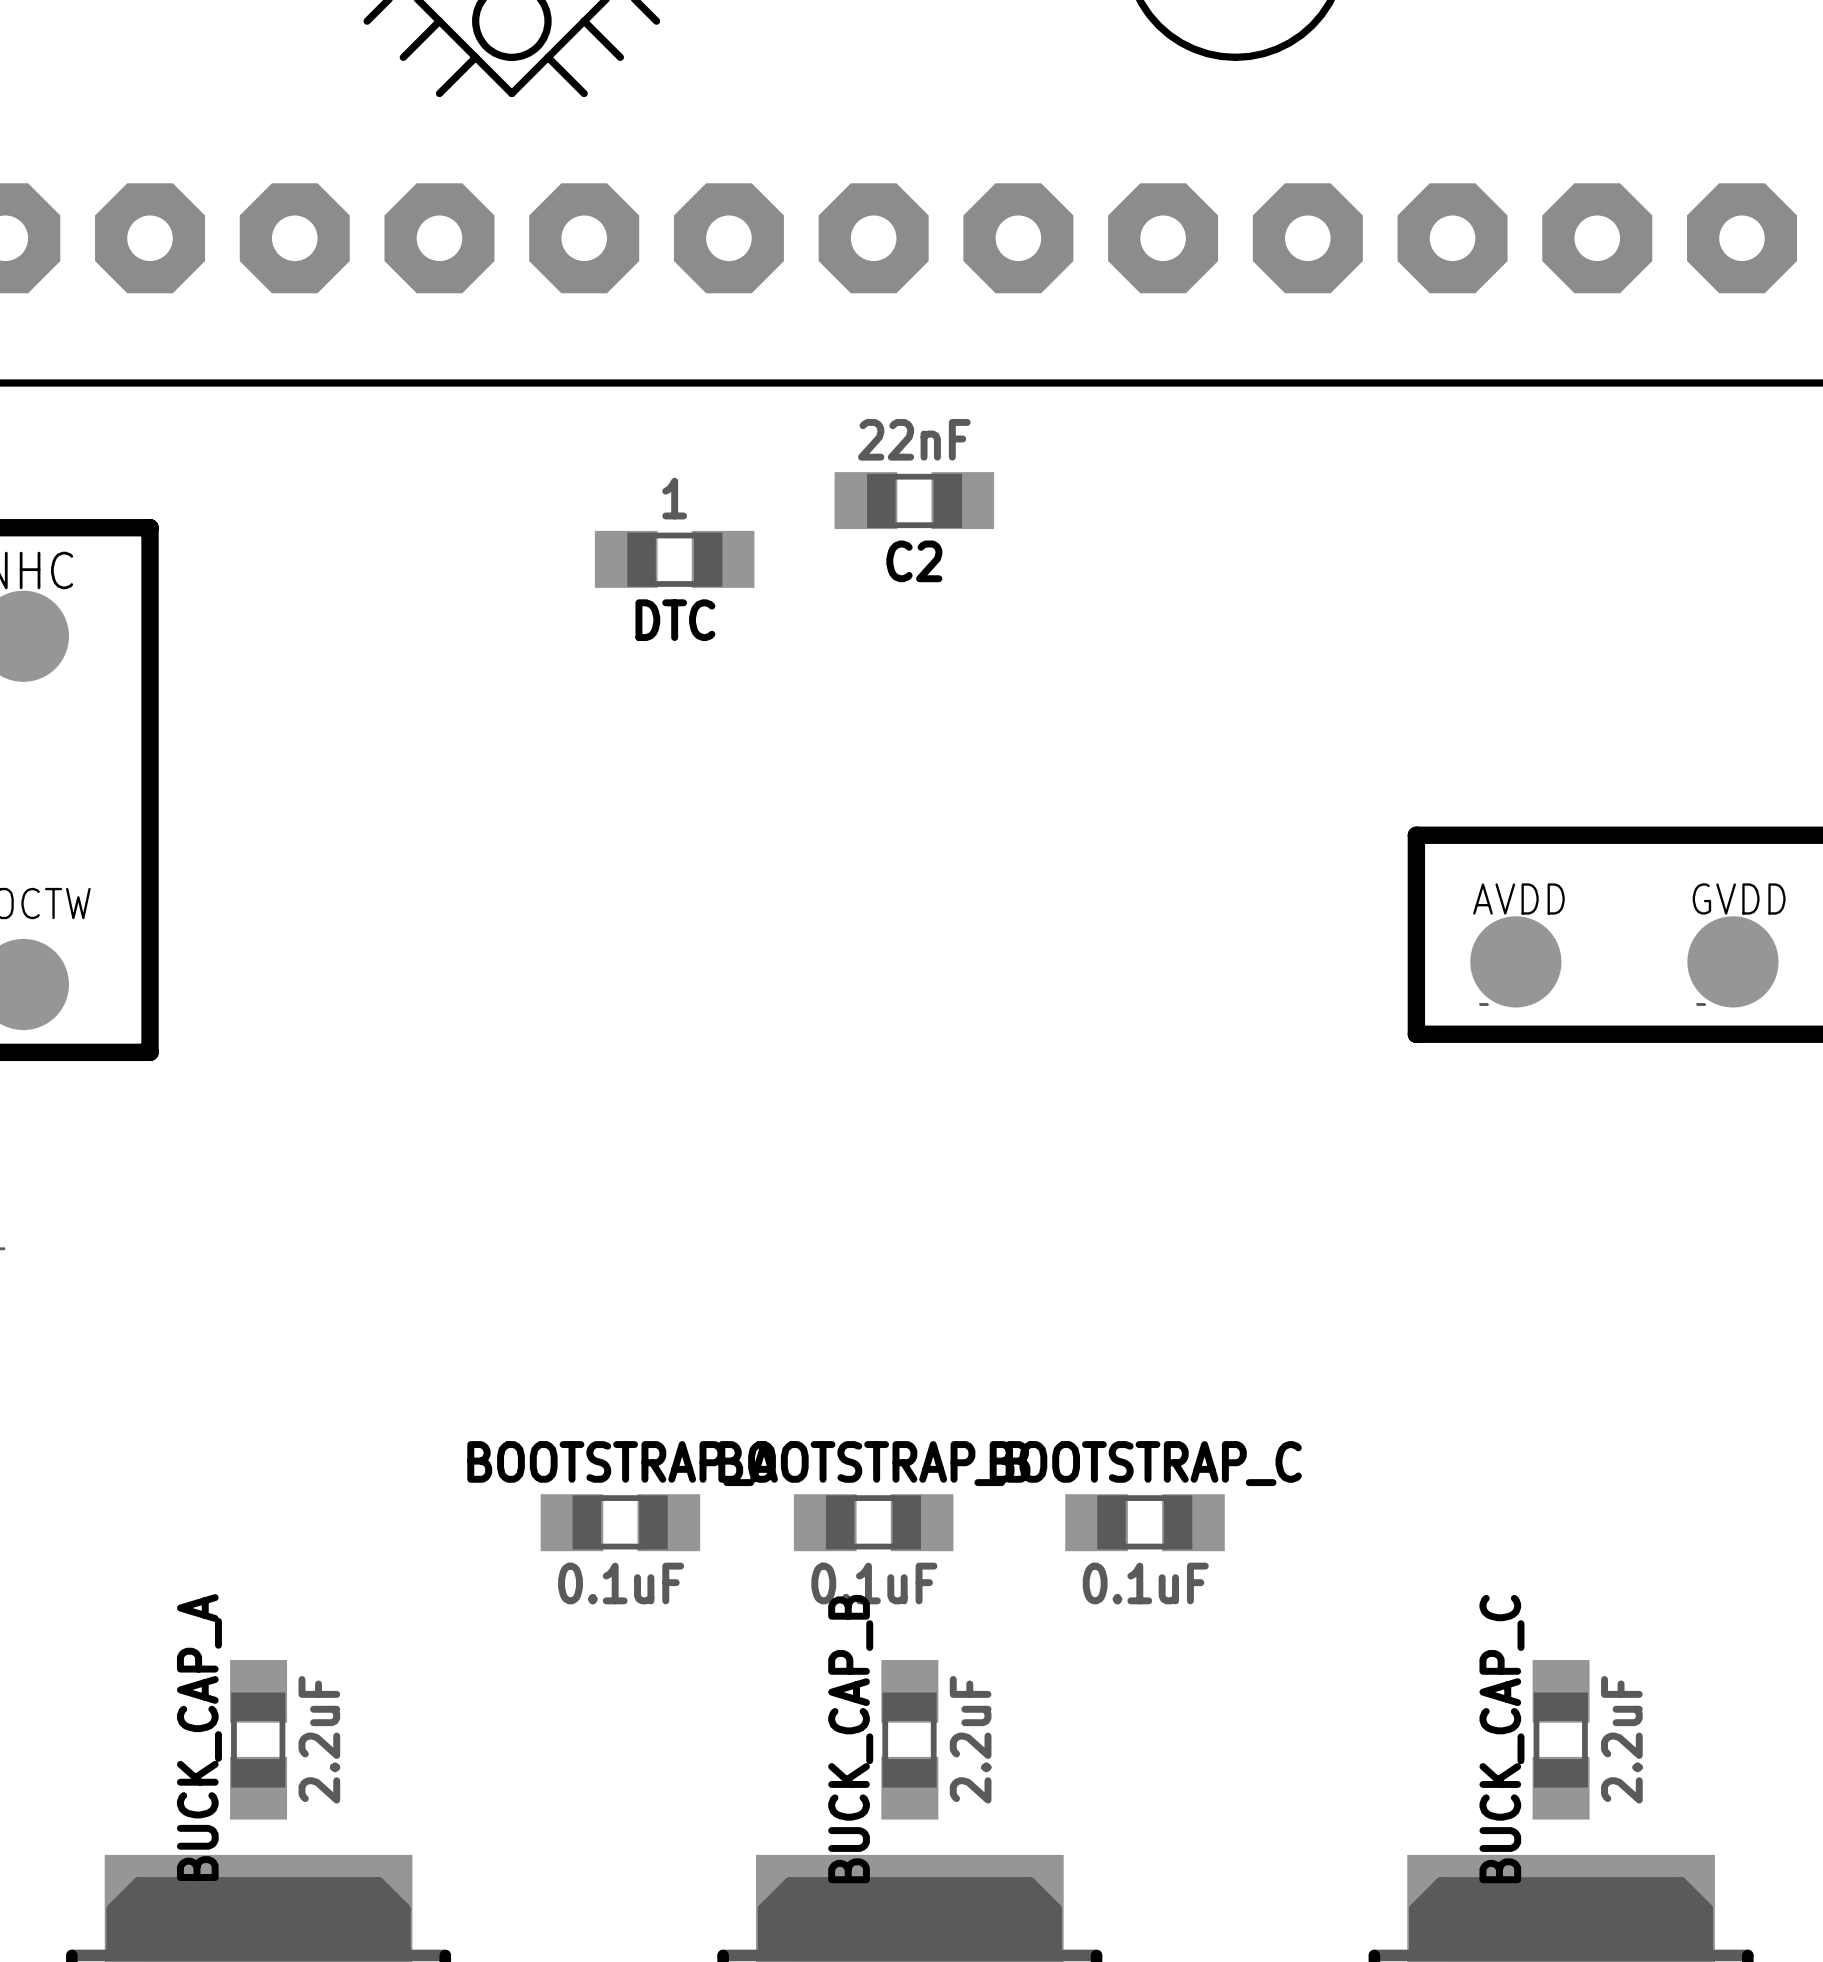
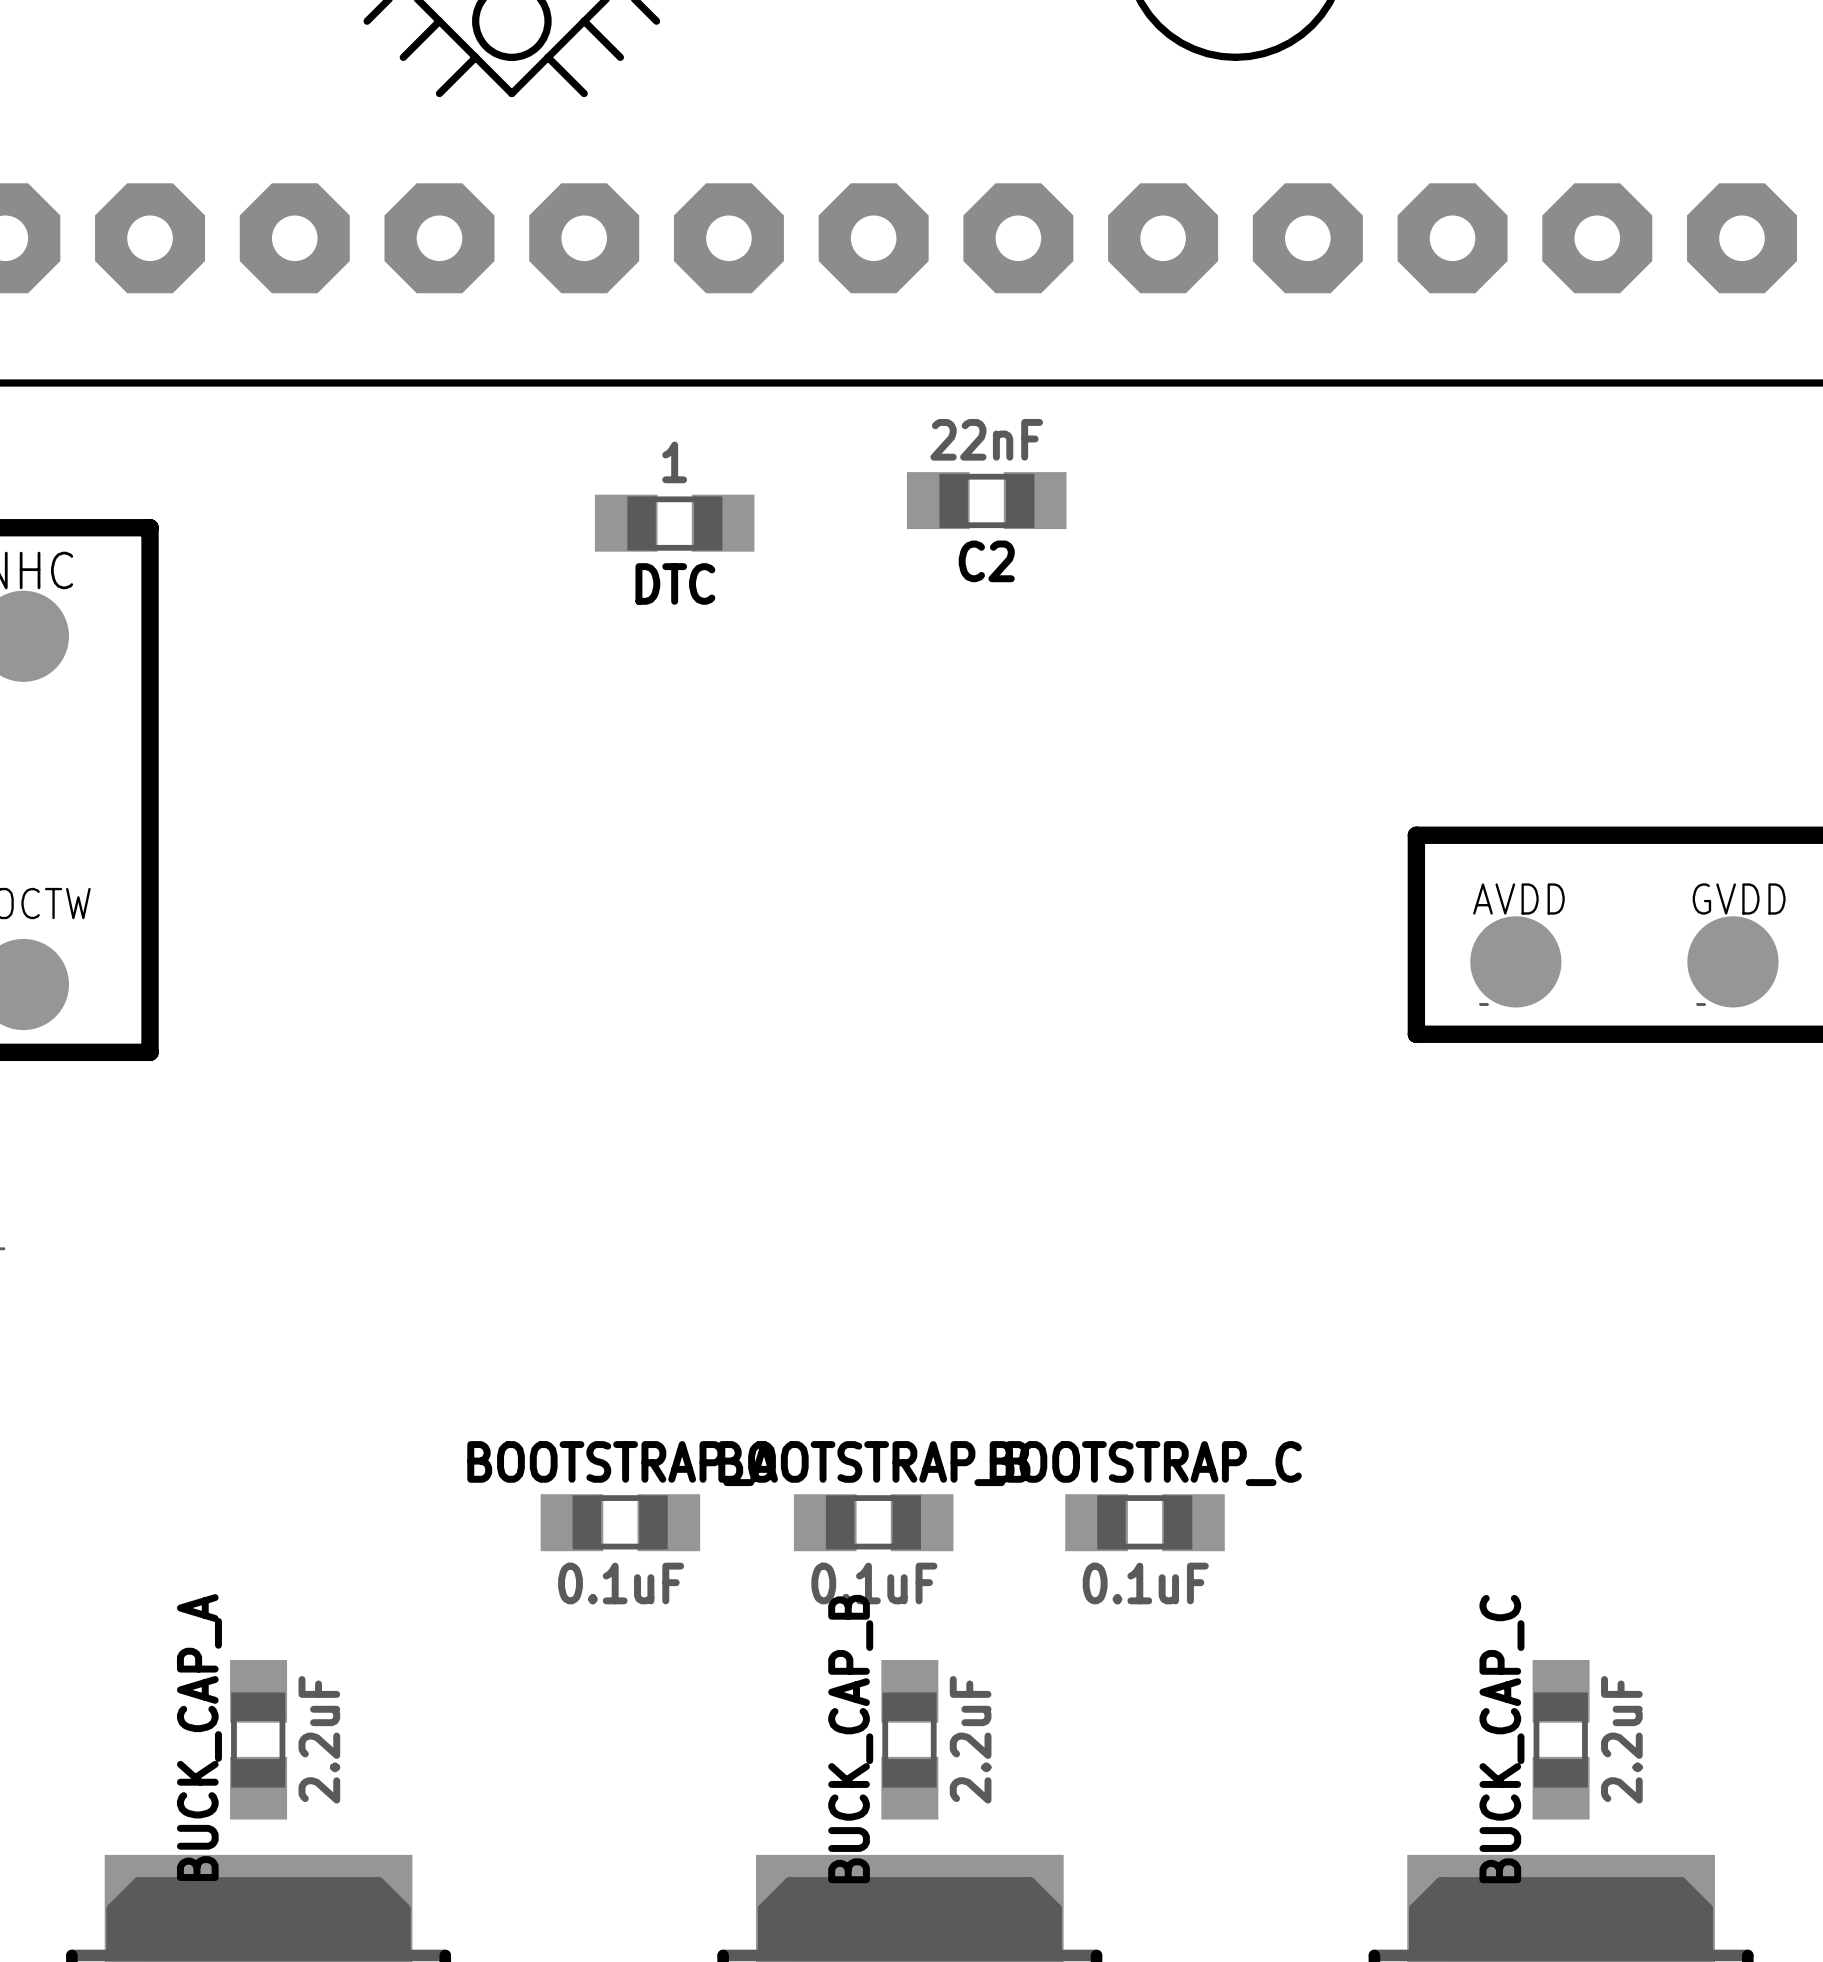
C2 position: (914, 500) -> (986, 500)
DTC position: (674, 559) -> (674, 523)

